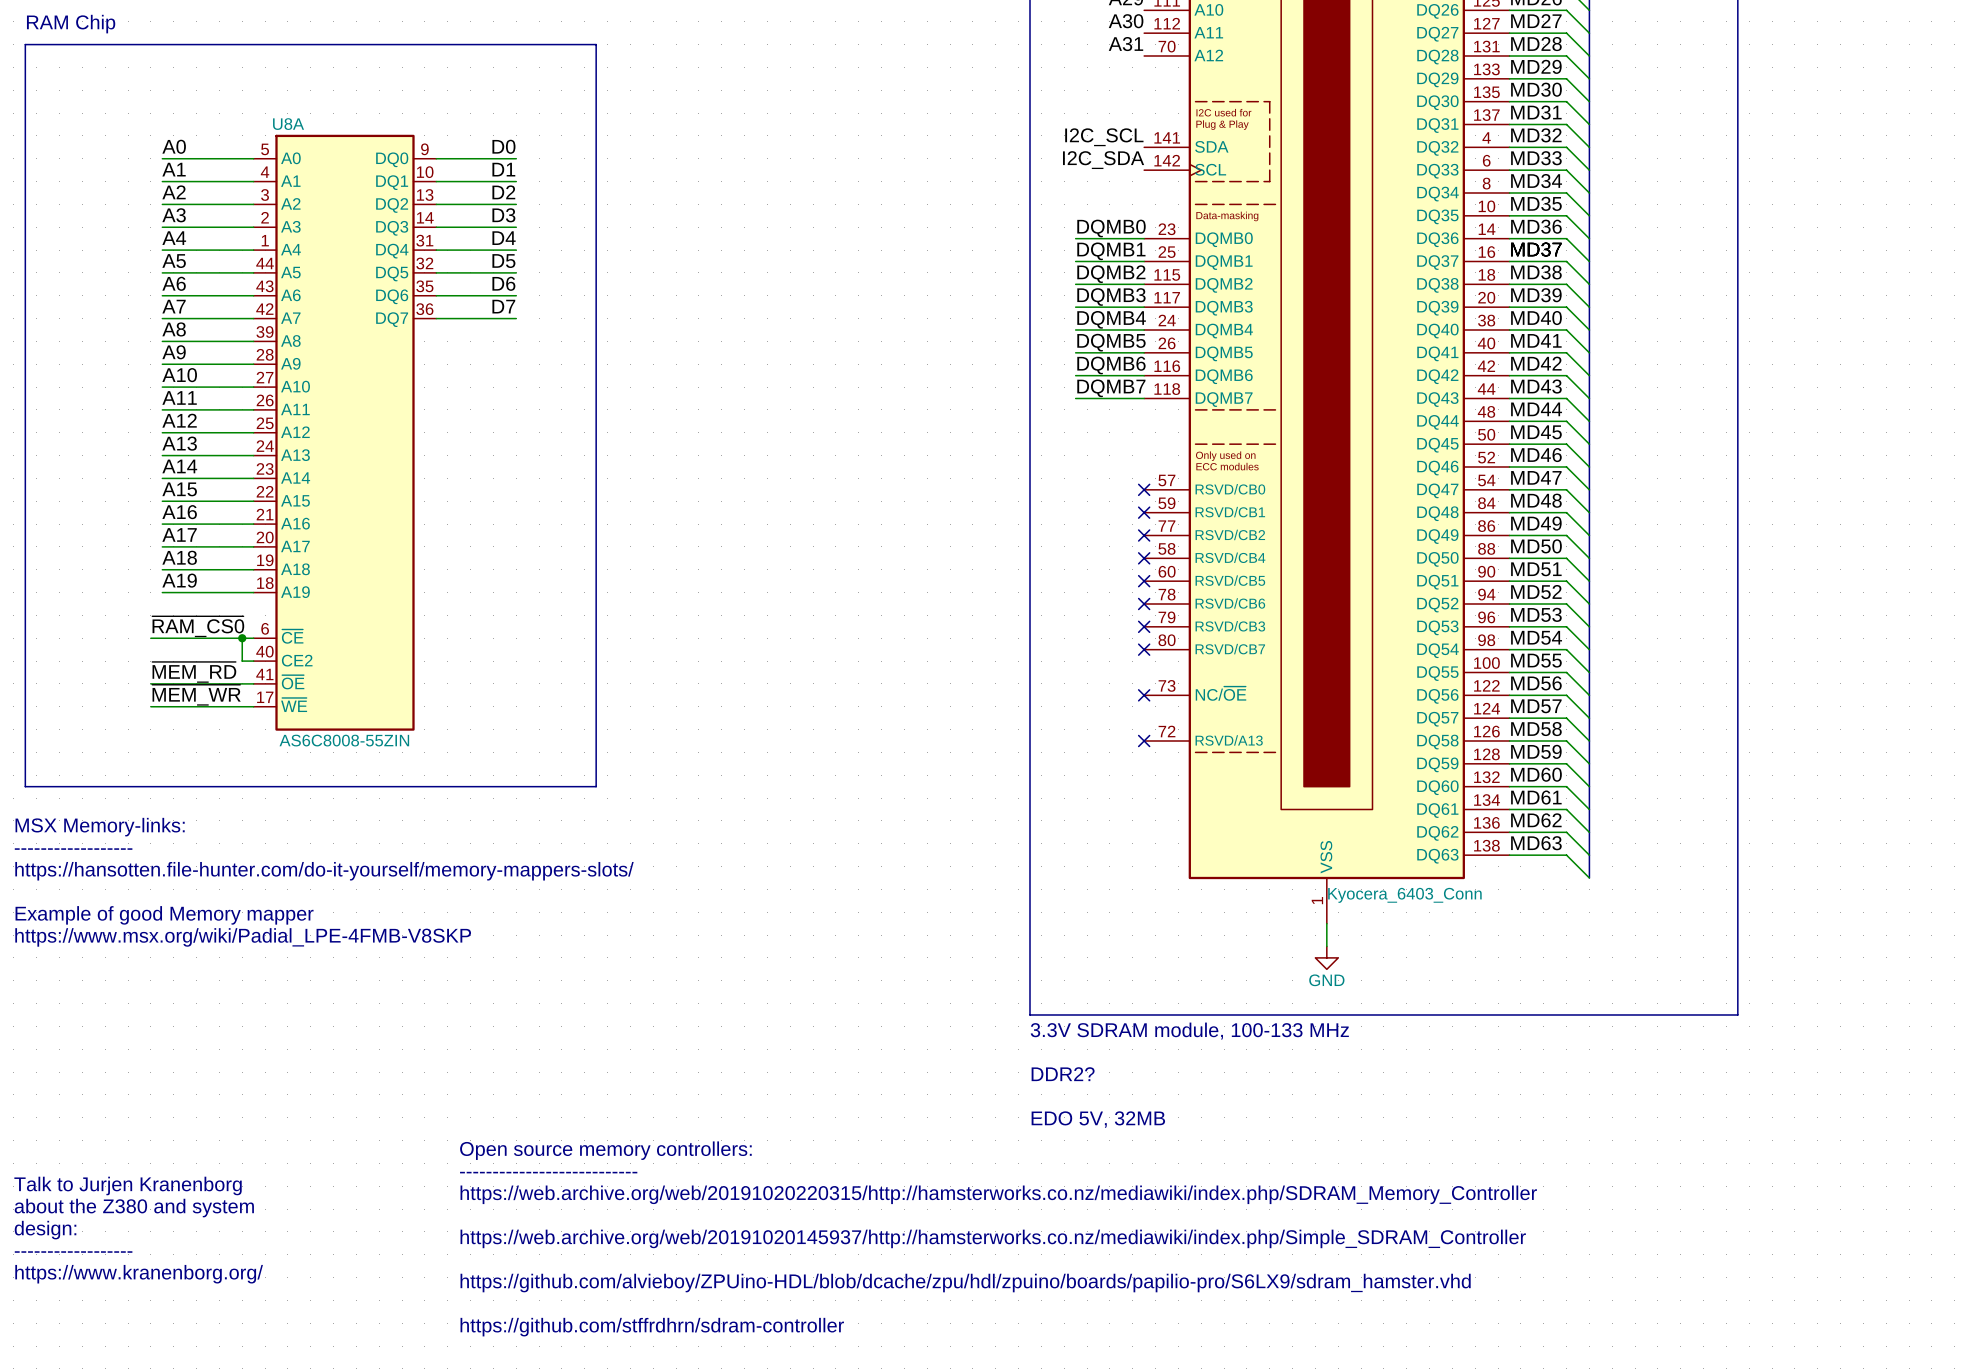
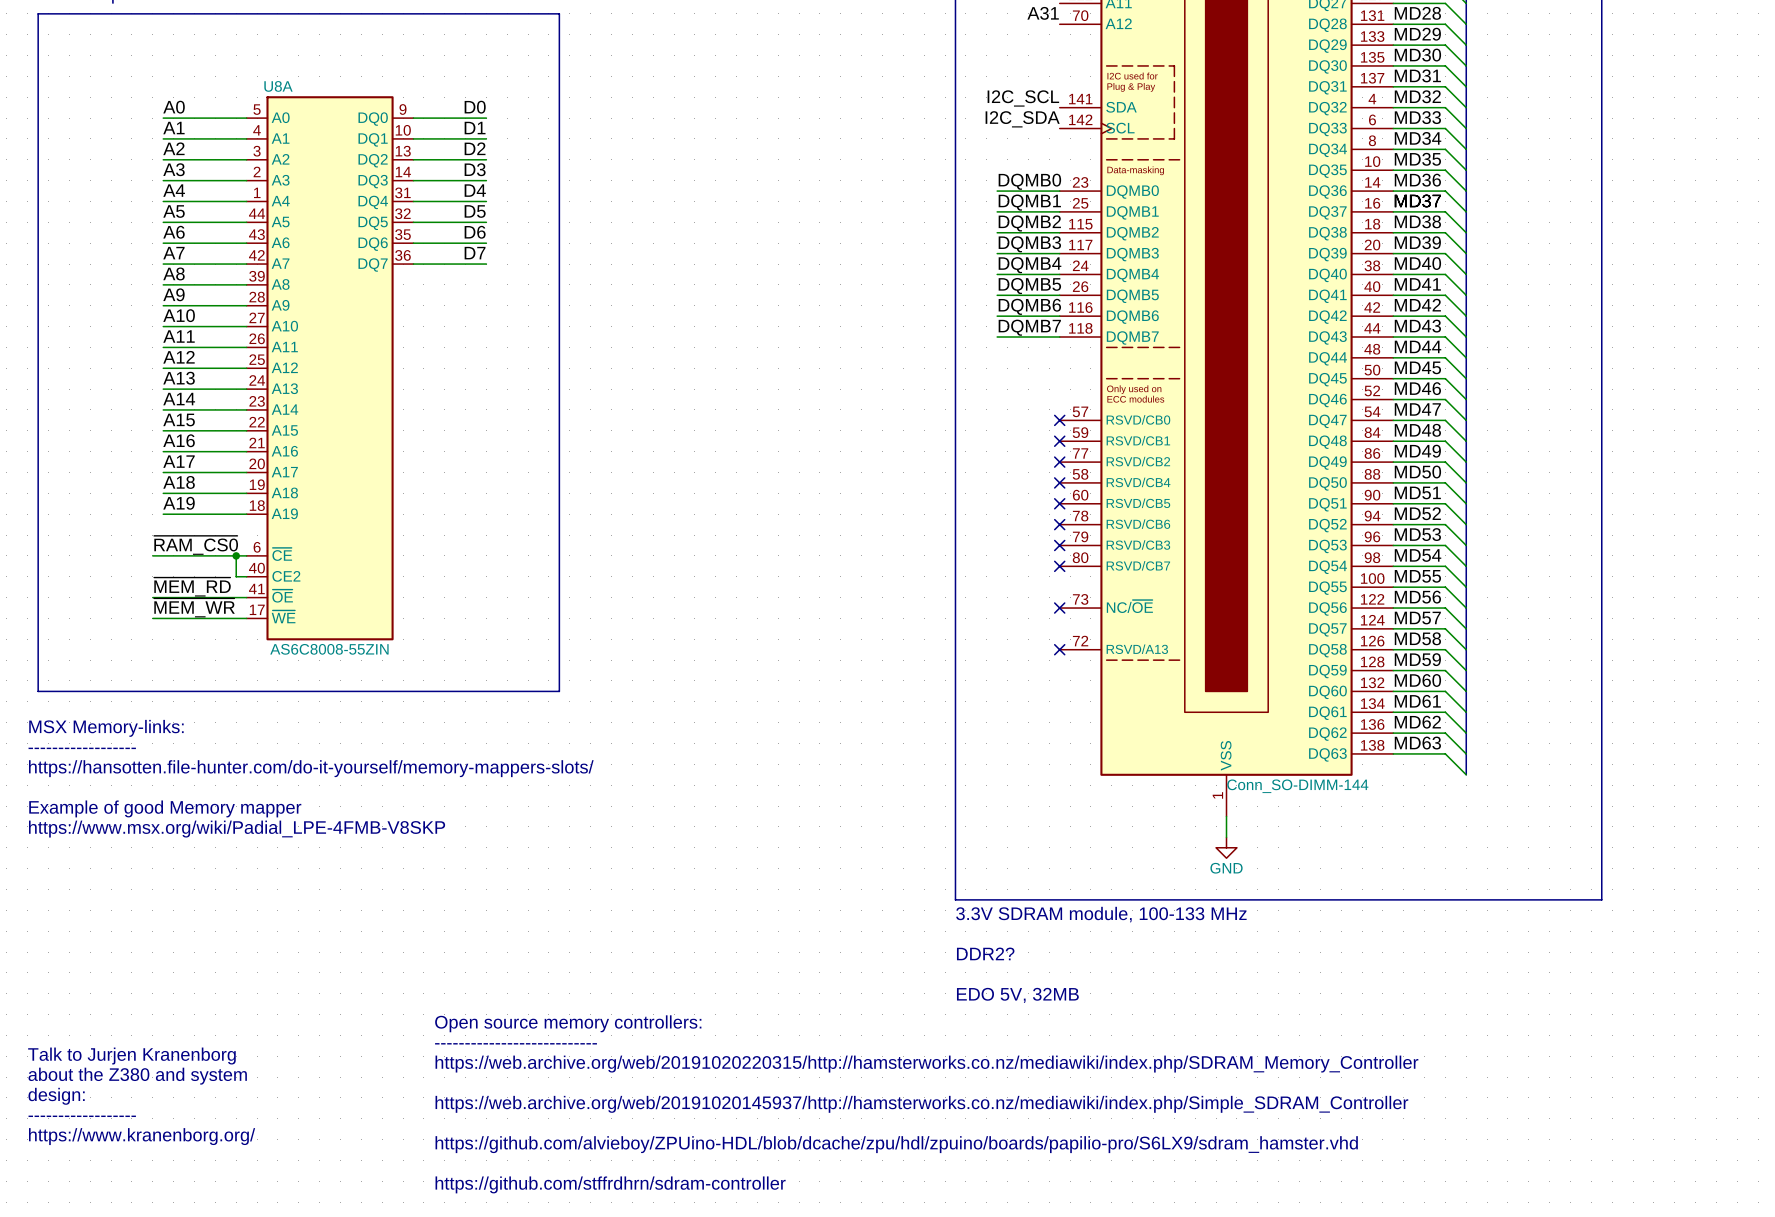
part value: Kyocera_6403_Conn (1404, 895) -> Conn_SO-DIMM-144 (1297, 786)

